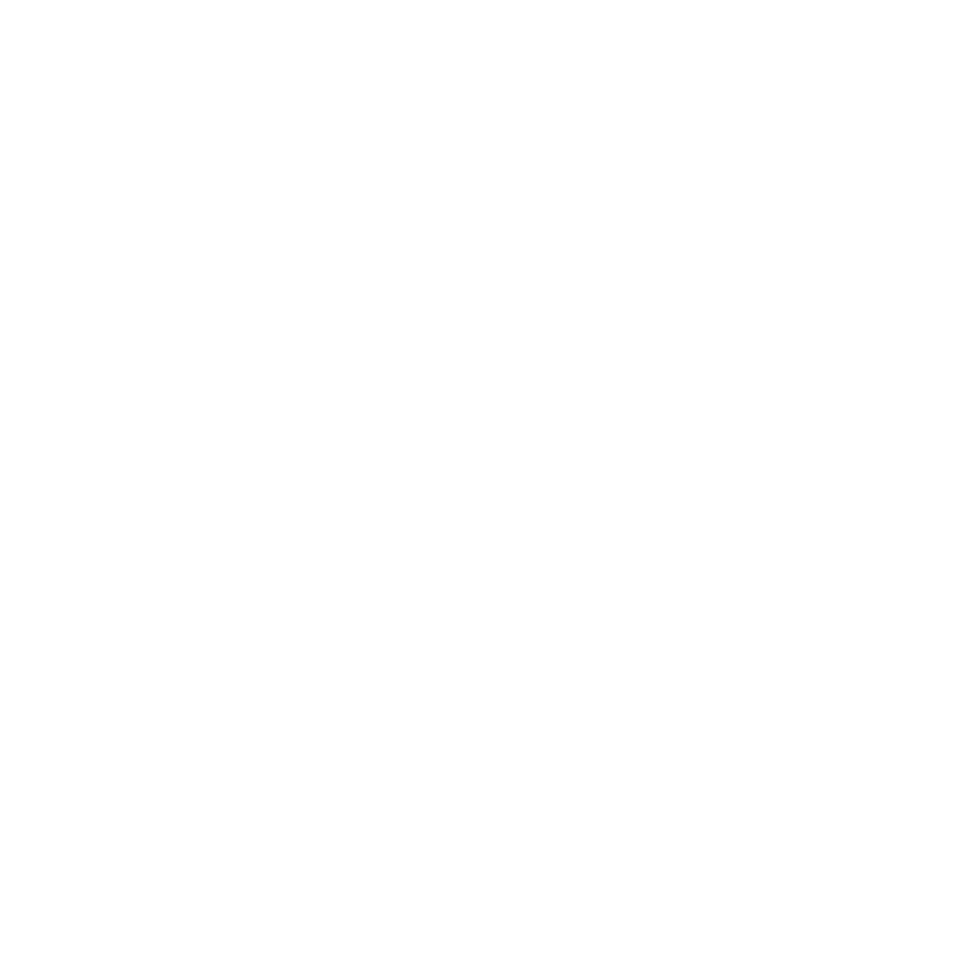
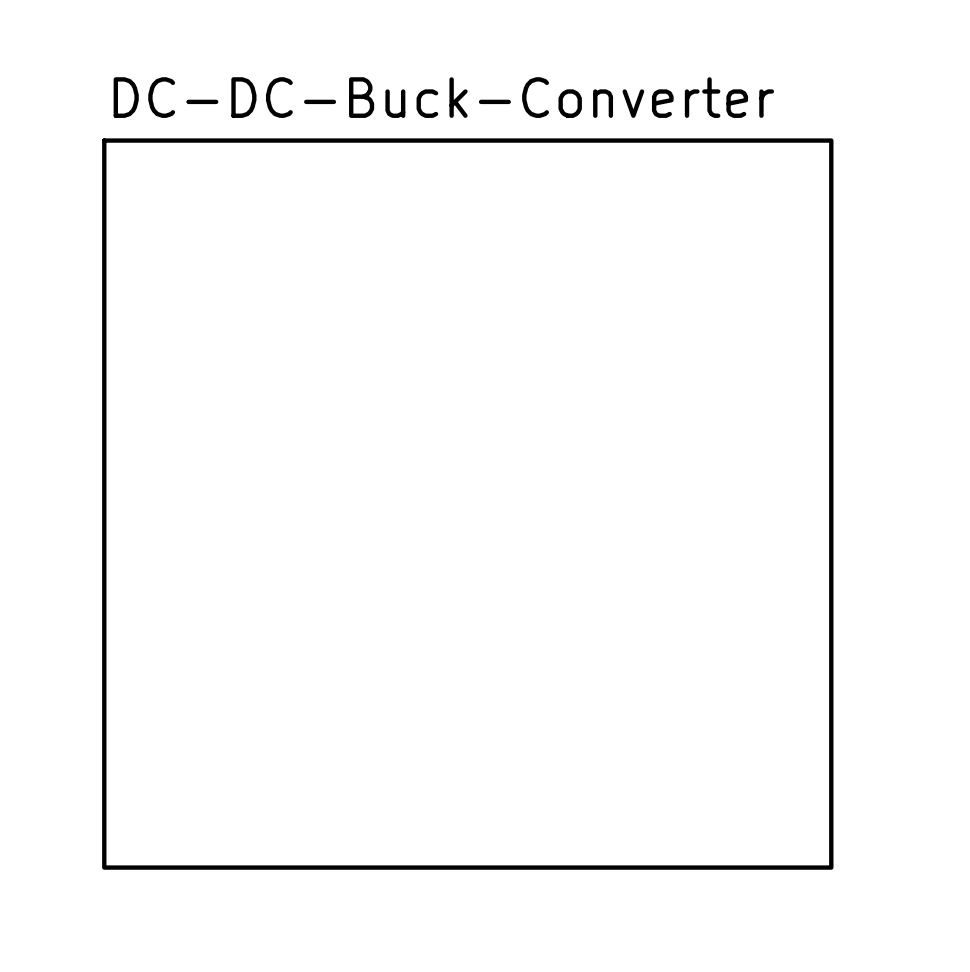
sheet DC-DC-Buck-Converter: none -> (467, 504)

